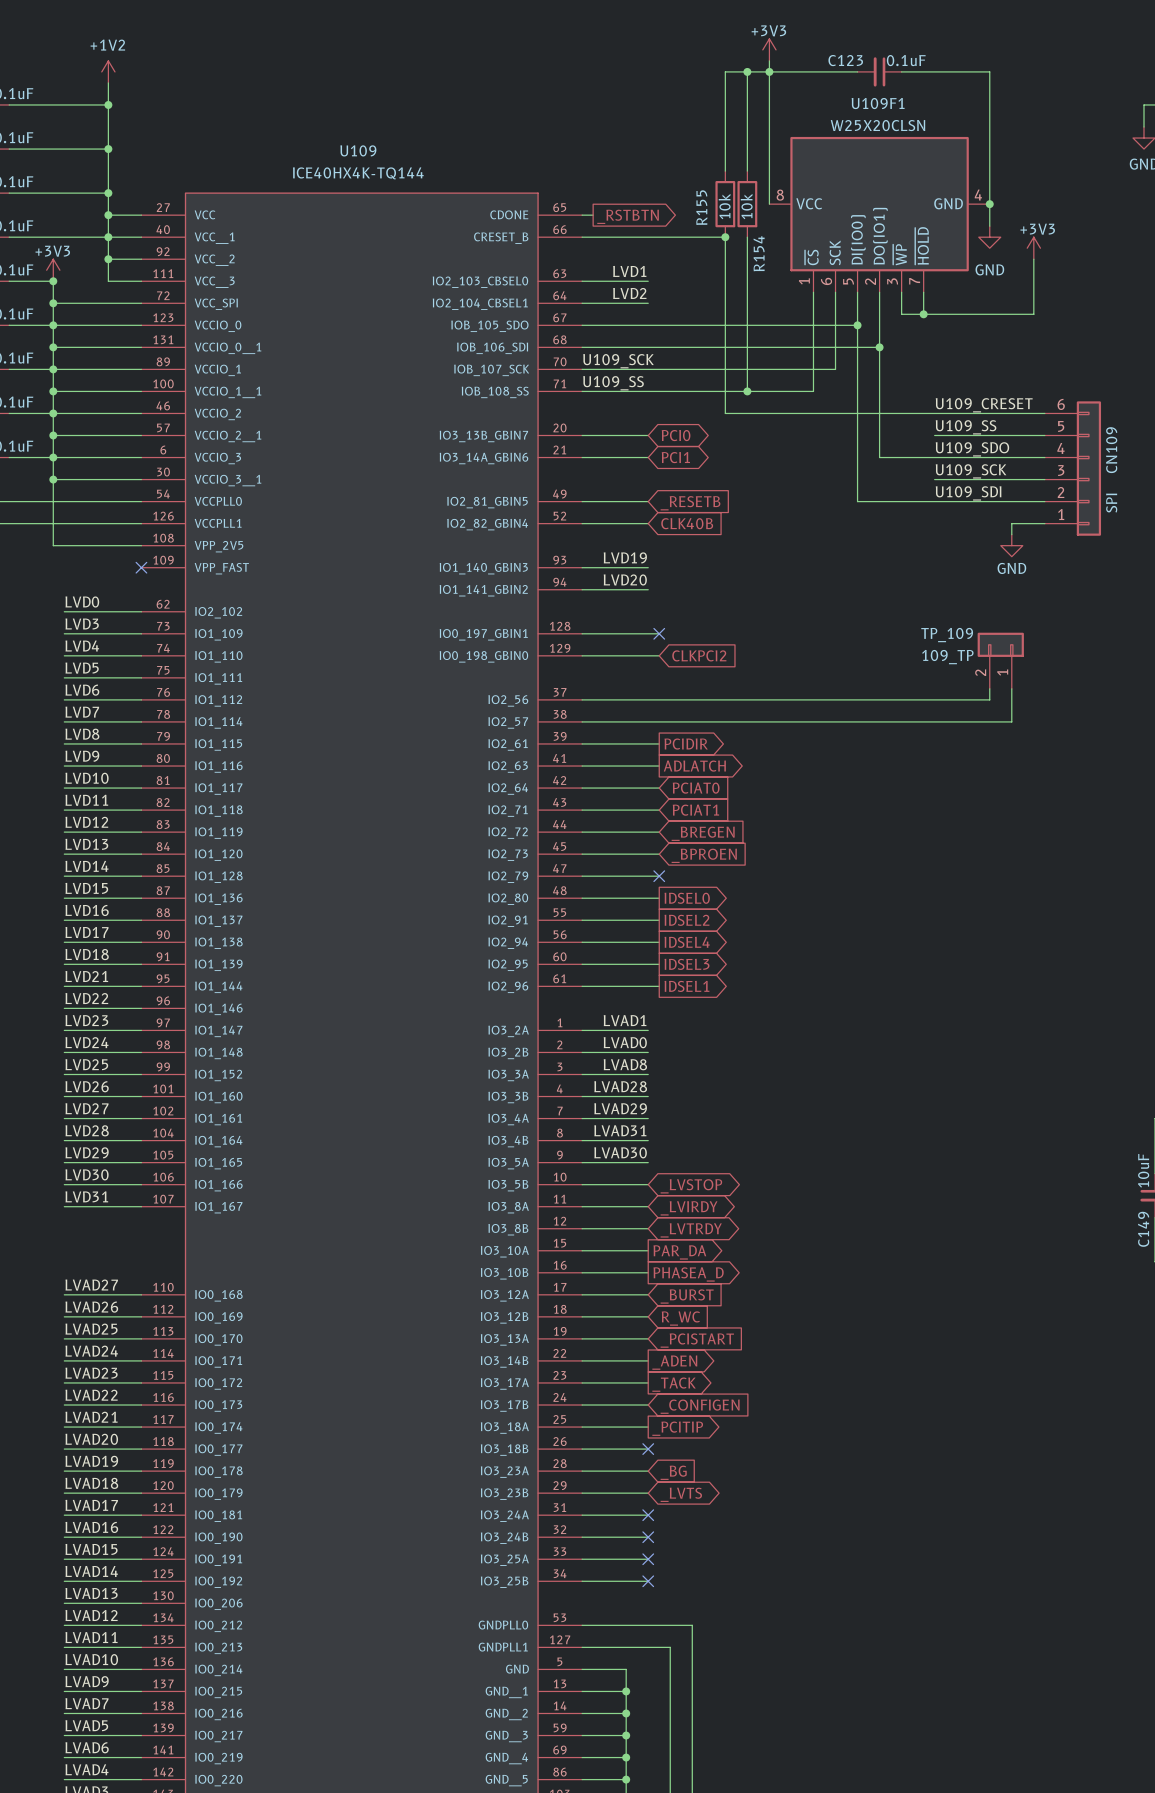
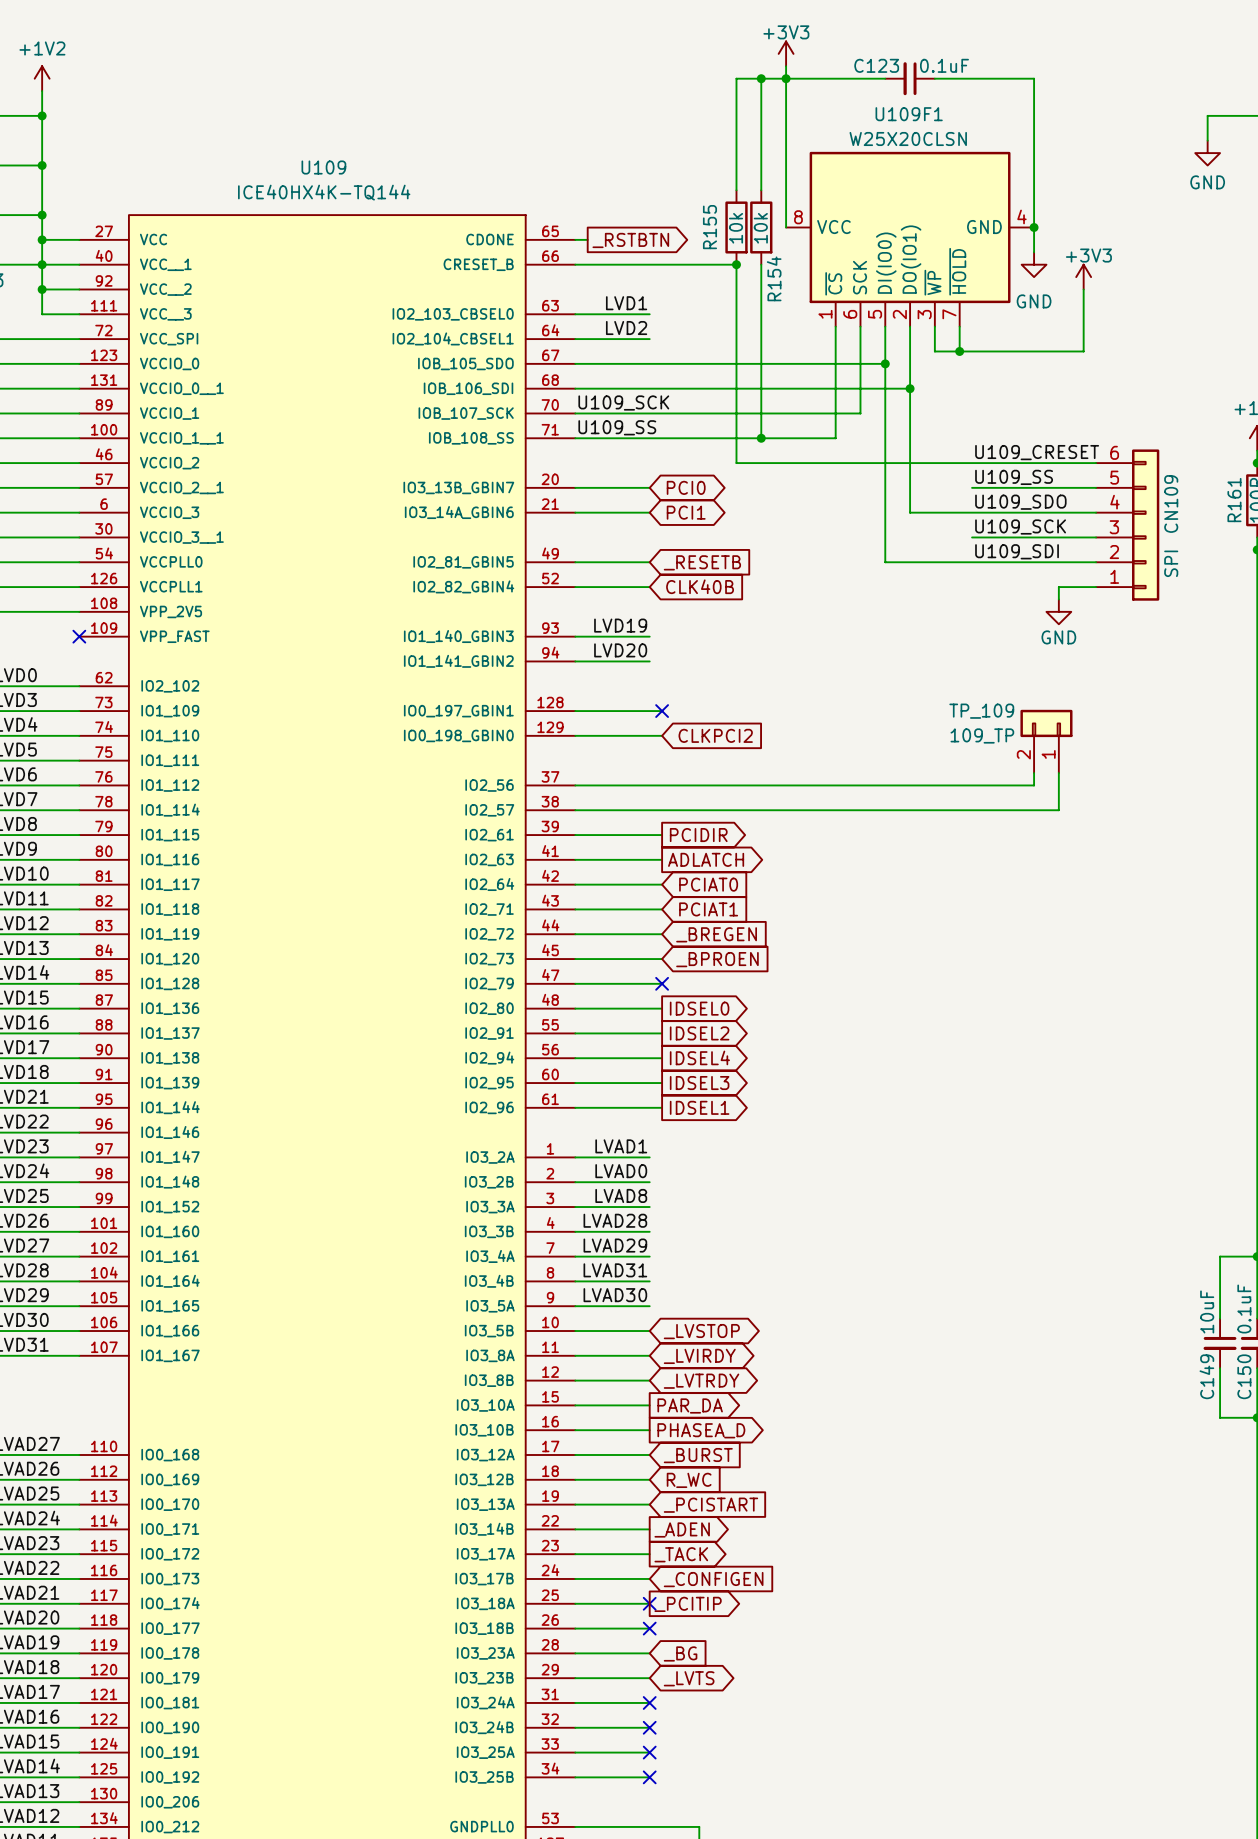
no-connect mark: none -> (649, 1603)

